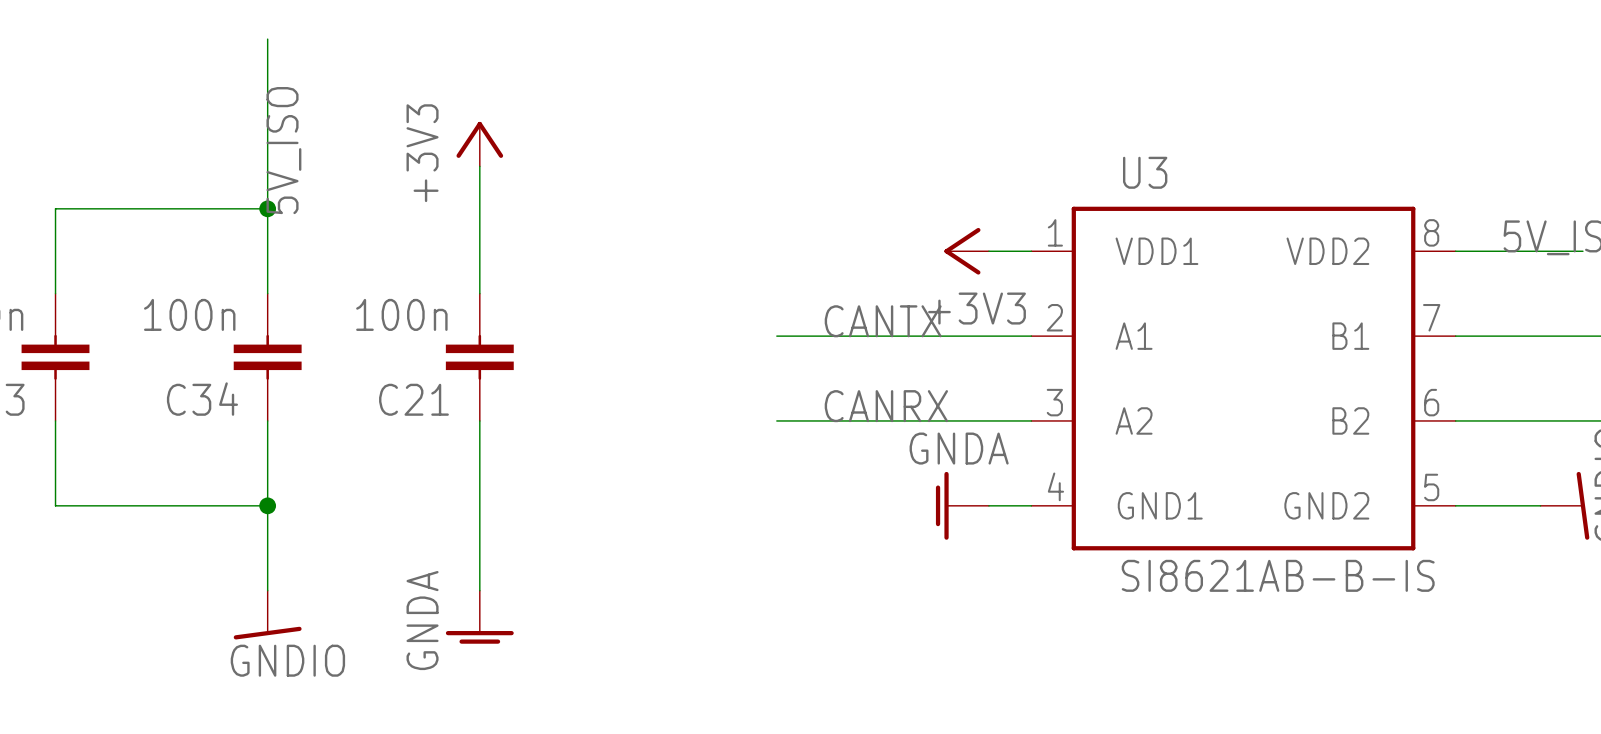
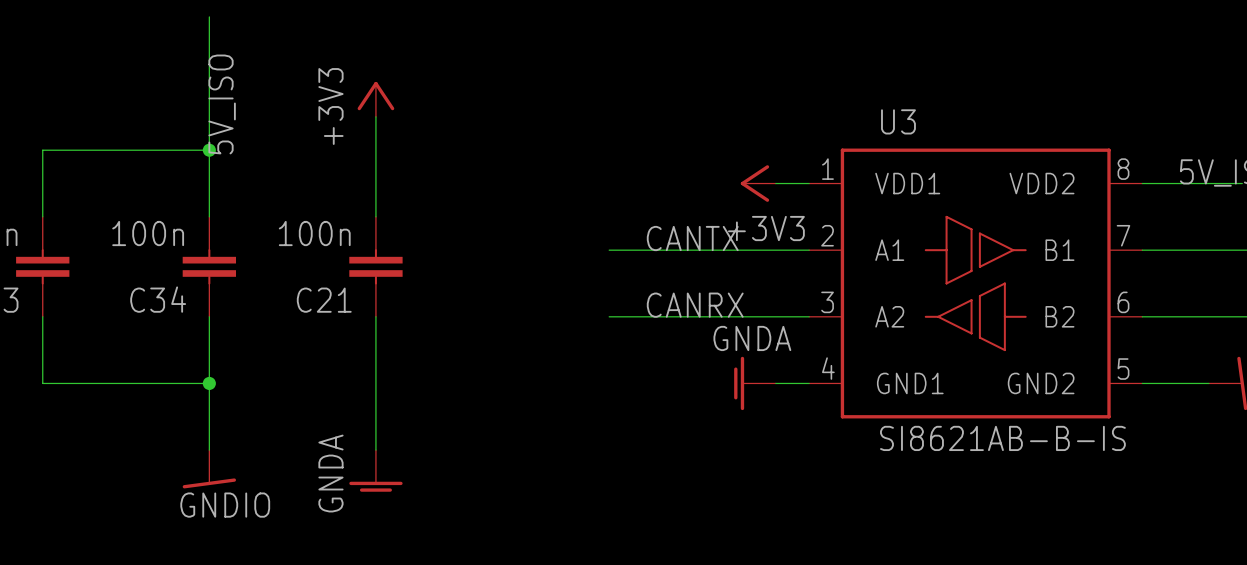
U3 symbol: [1031, 206, 1456, 551] -> [809, 148, 1143, 419]

